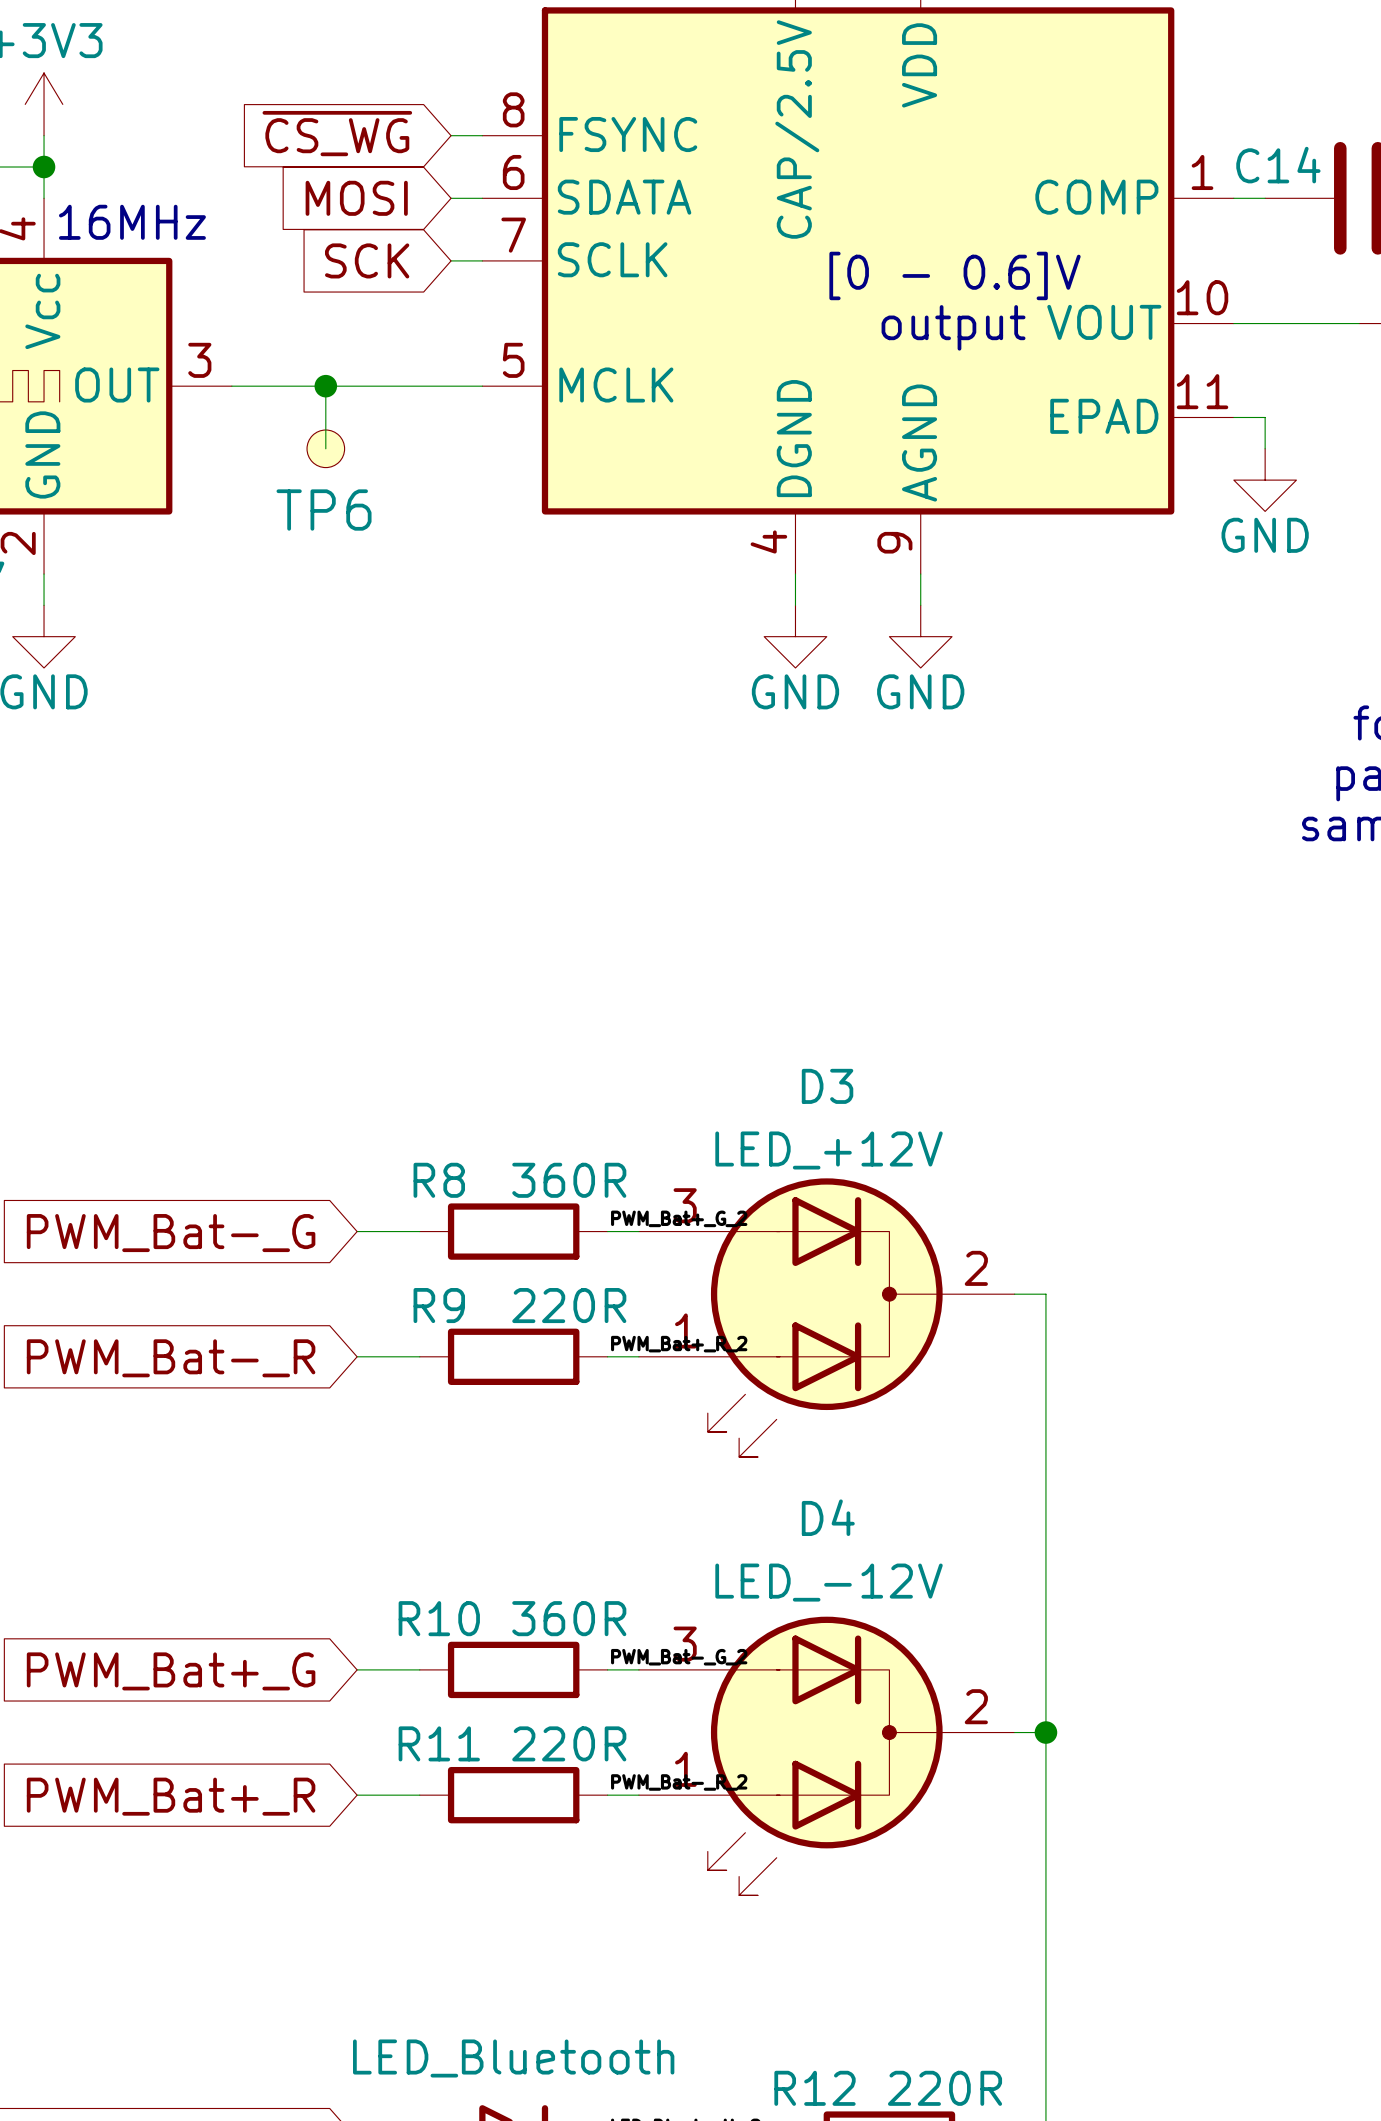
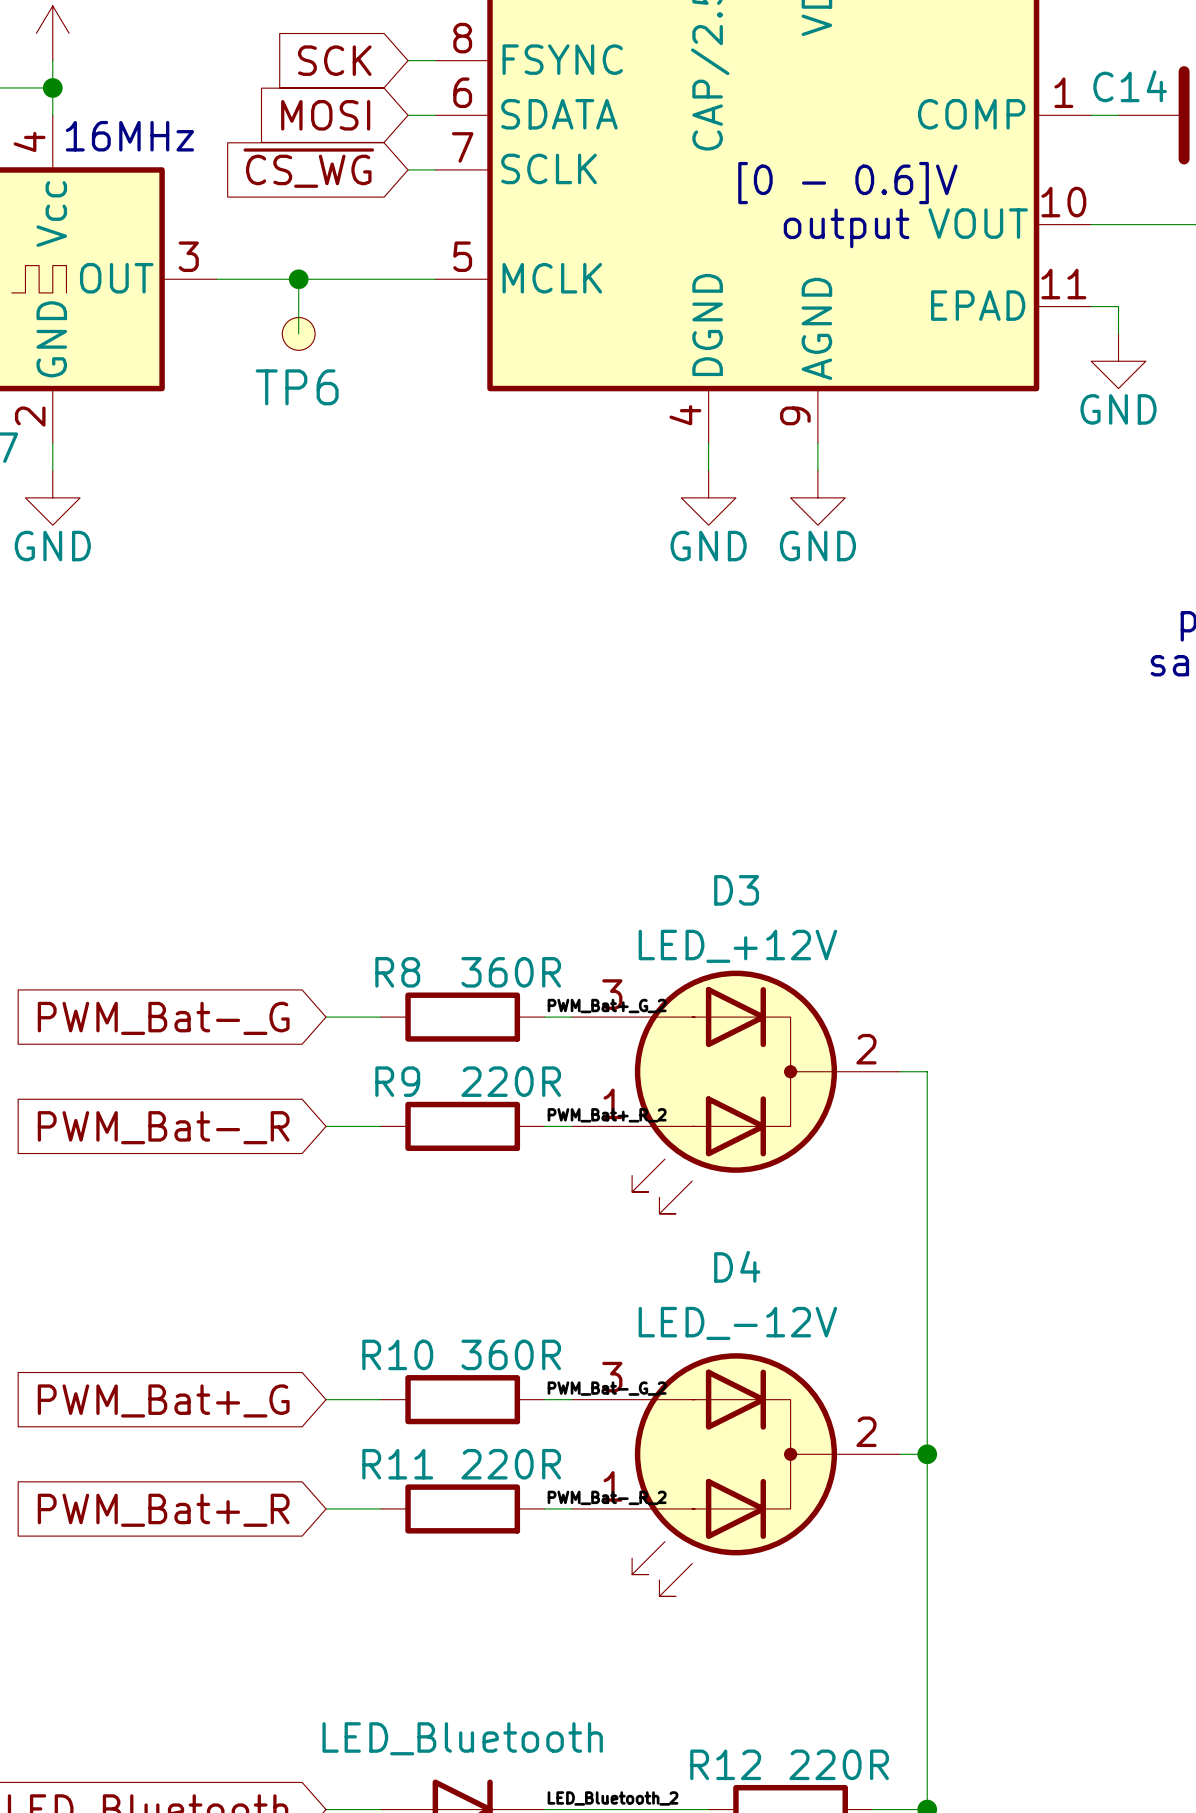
global label: ~{CS_WG} (337, 133) -> SCK (334, 60)
global label: SCK (367, 260) -> ~{CS_WG} (308, 168)

